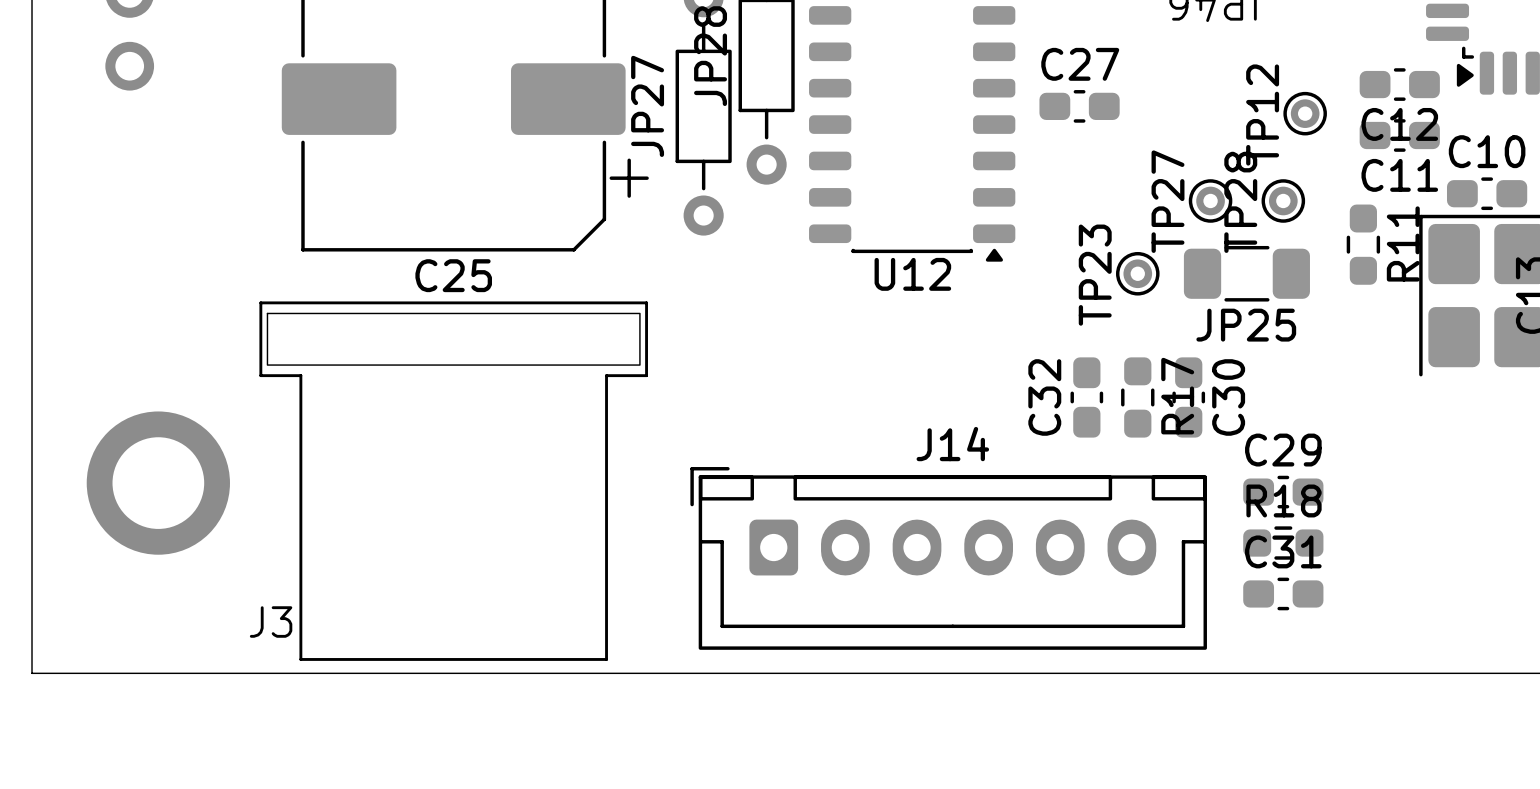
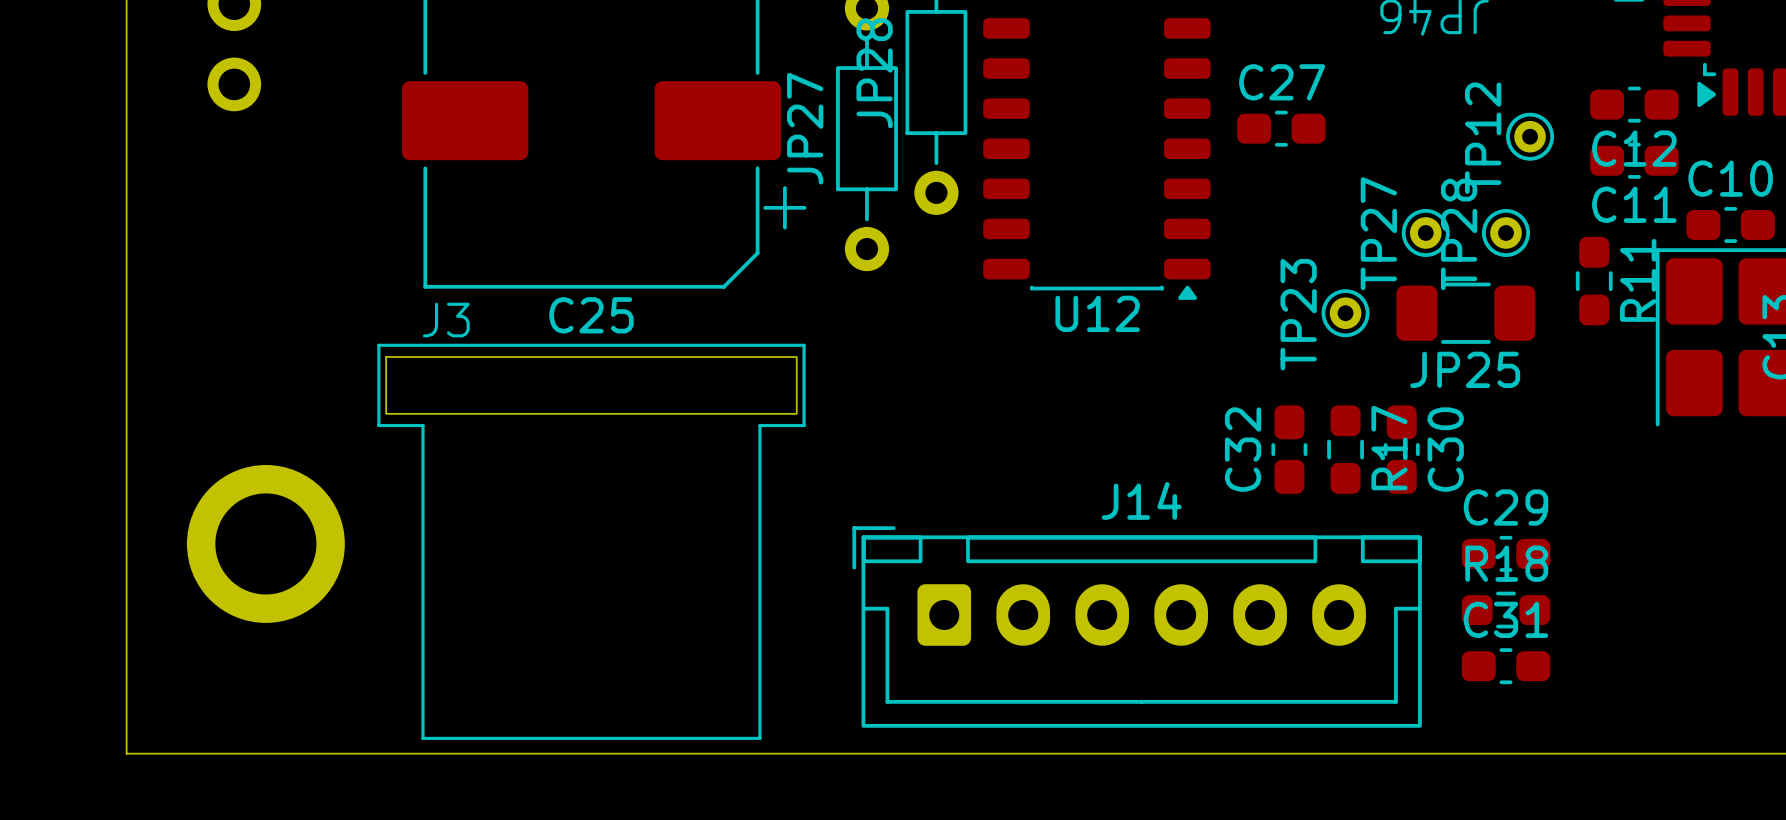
J3 name position: J3 (271, 622) -> J3 (446, 320)

